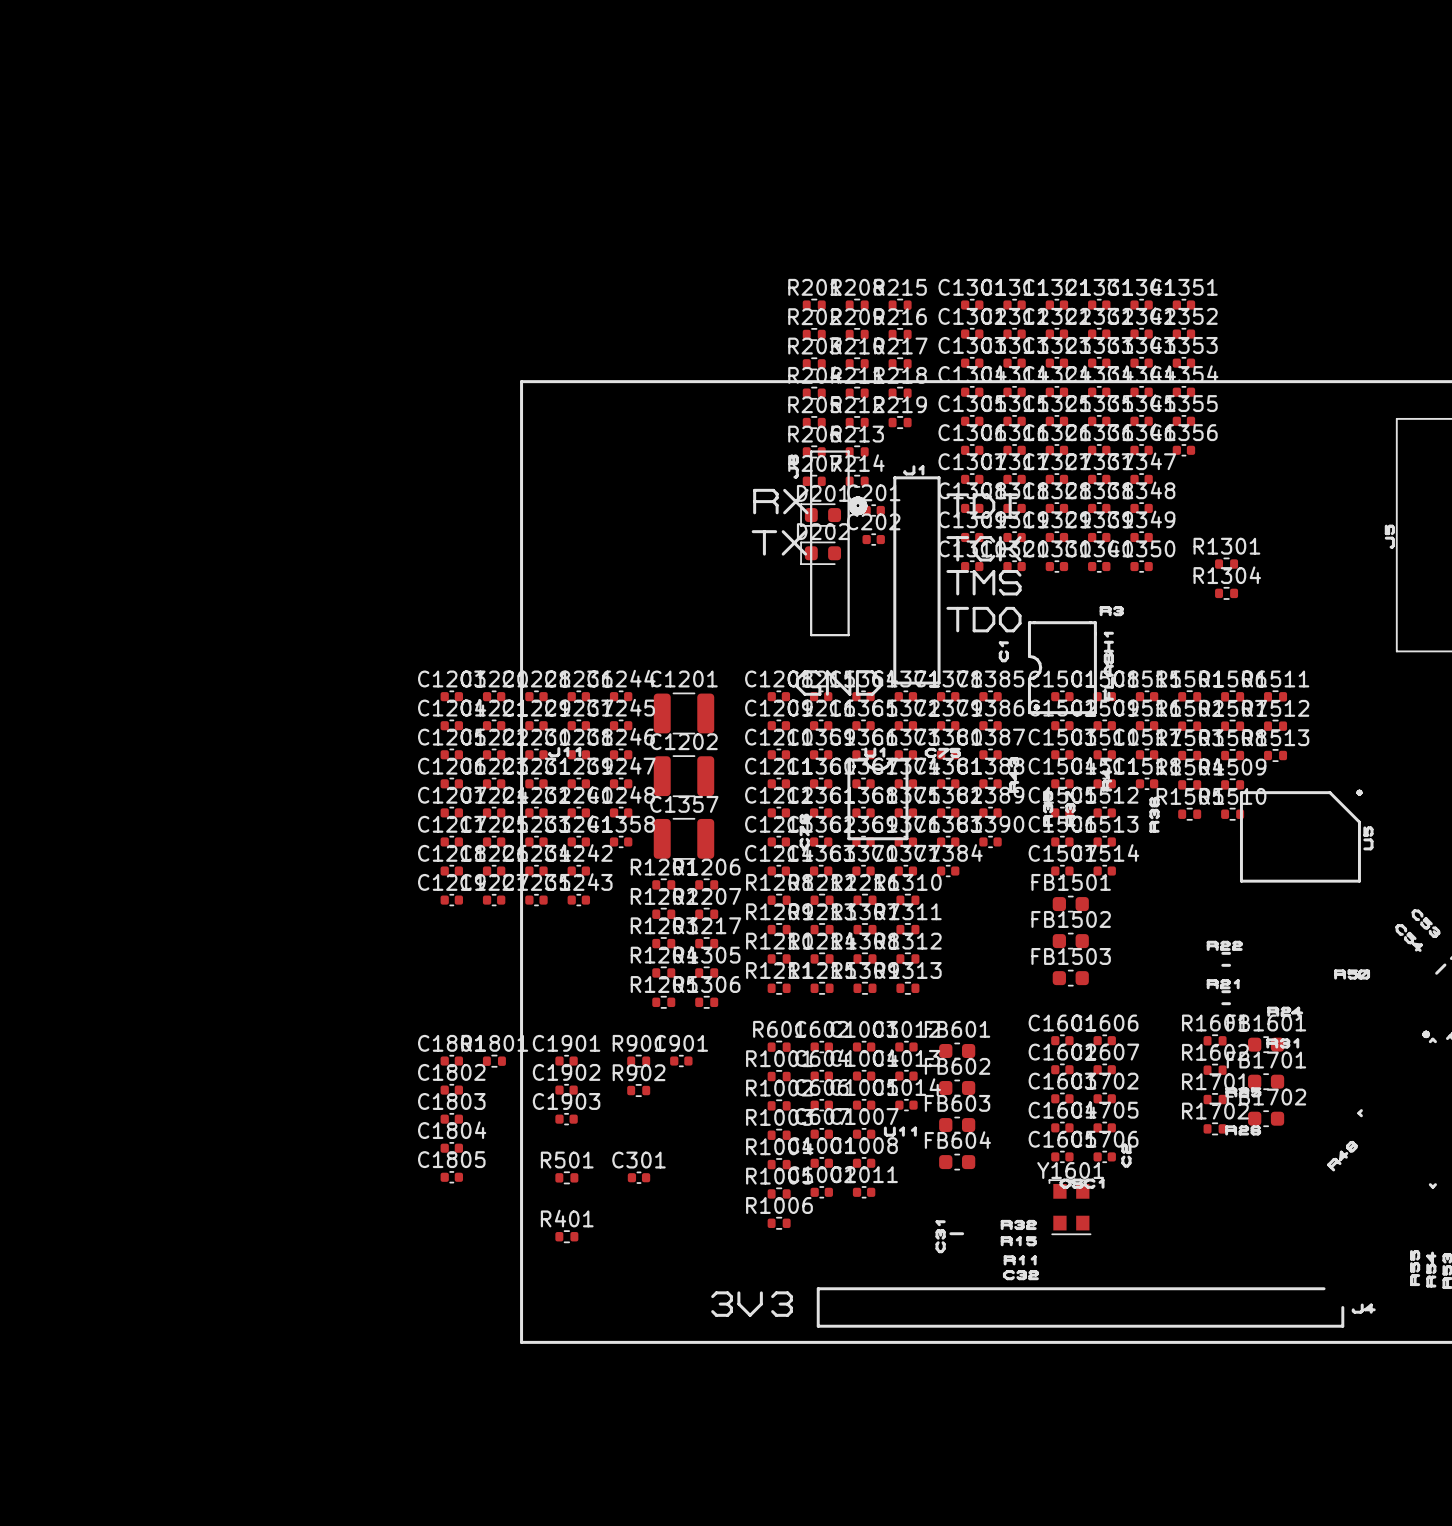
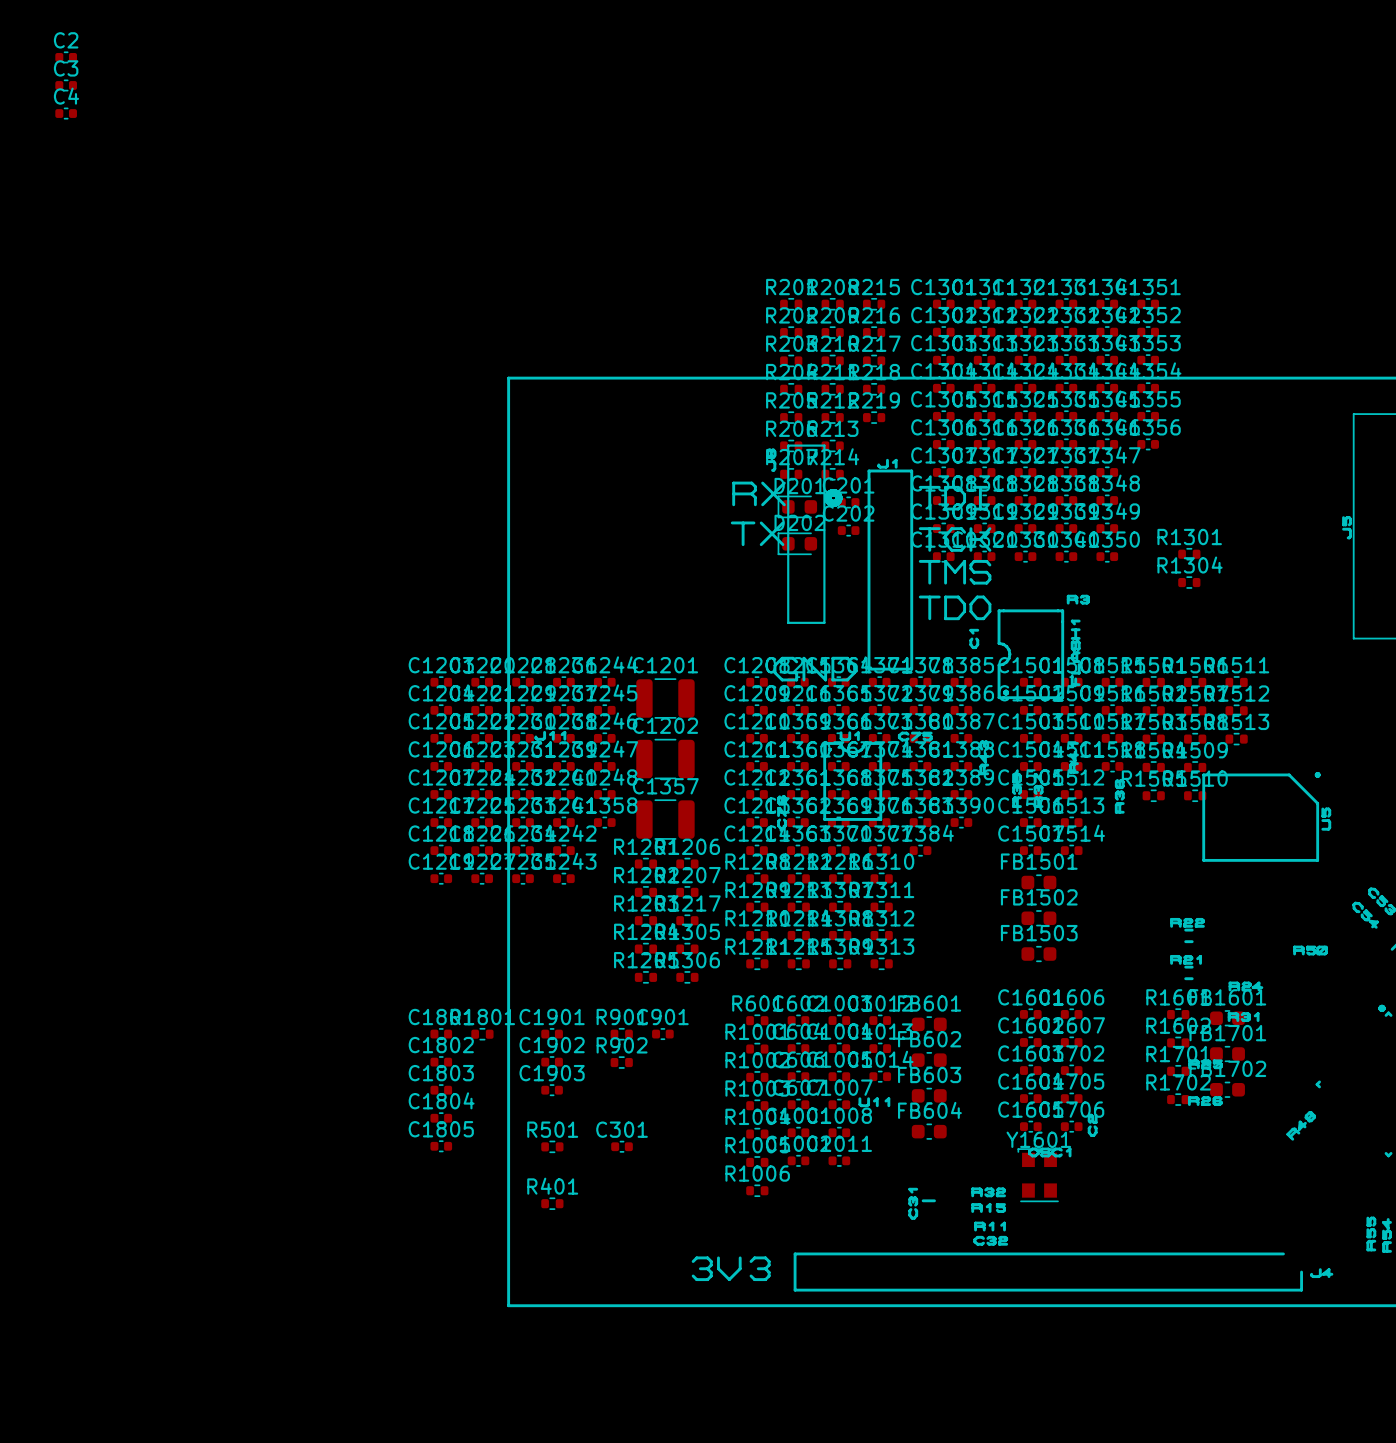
C2: none -> (66, 57)
C3: none -> (66, 85)
C4: none -> (66, 113)

